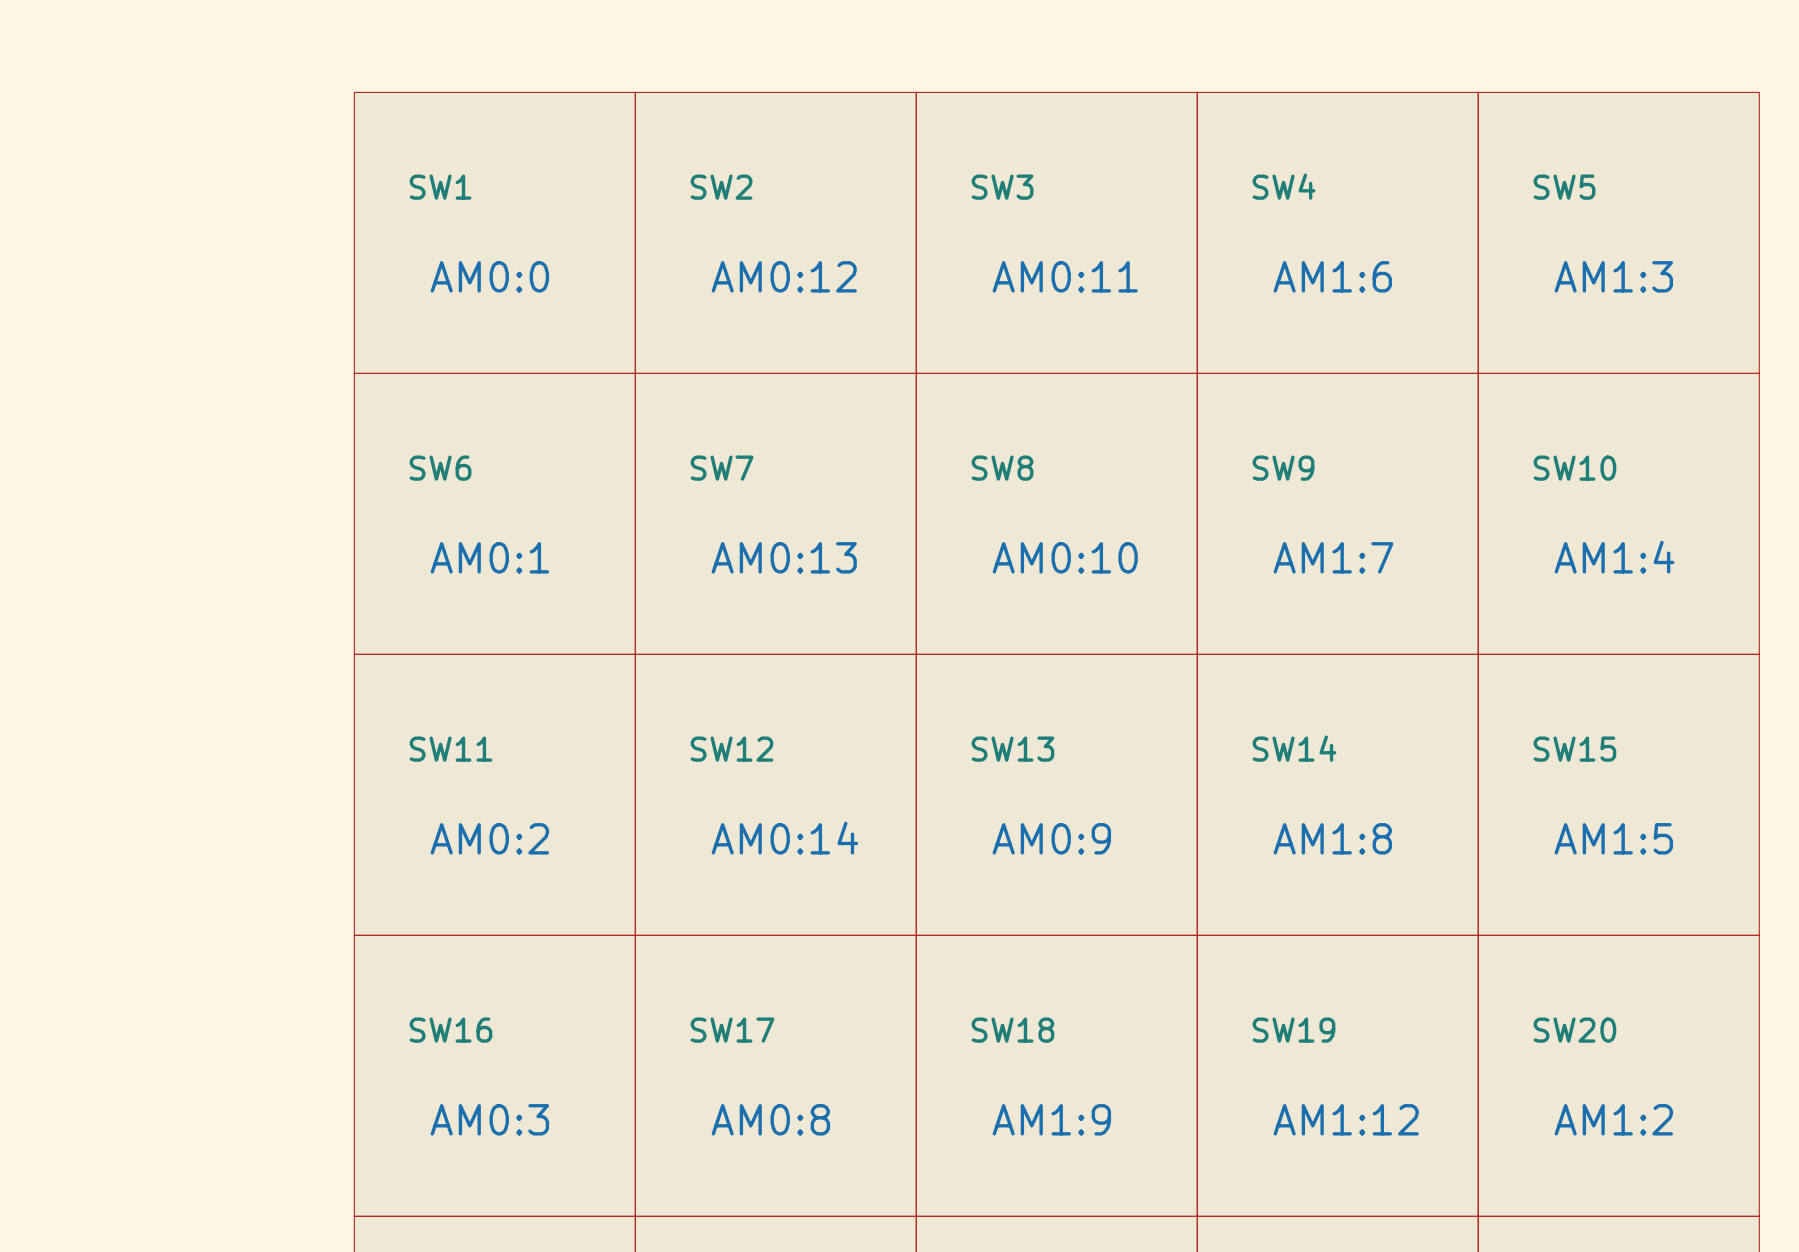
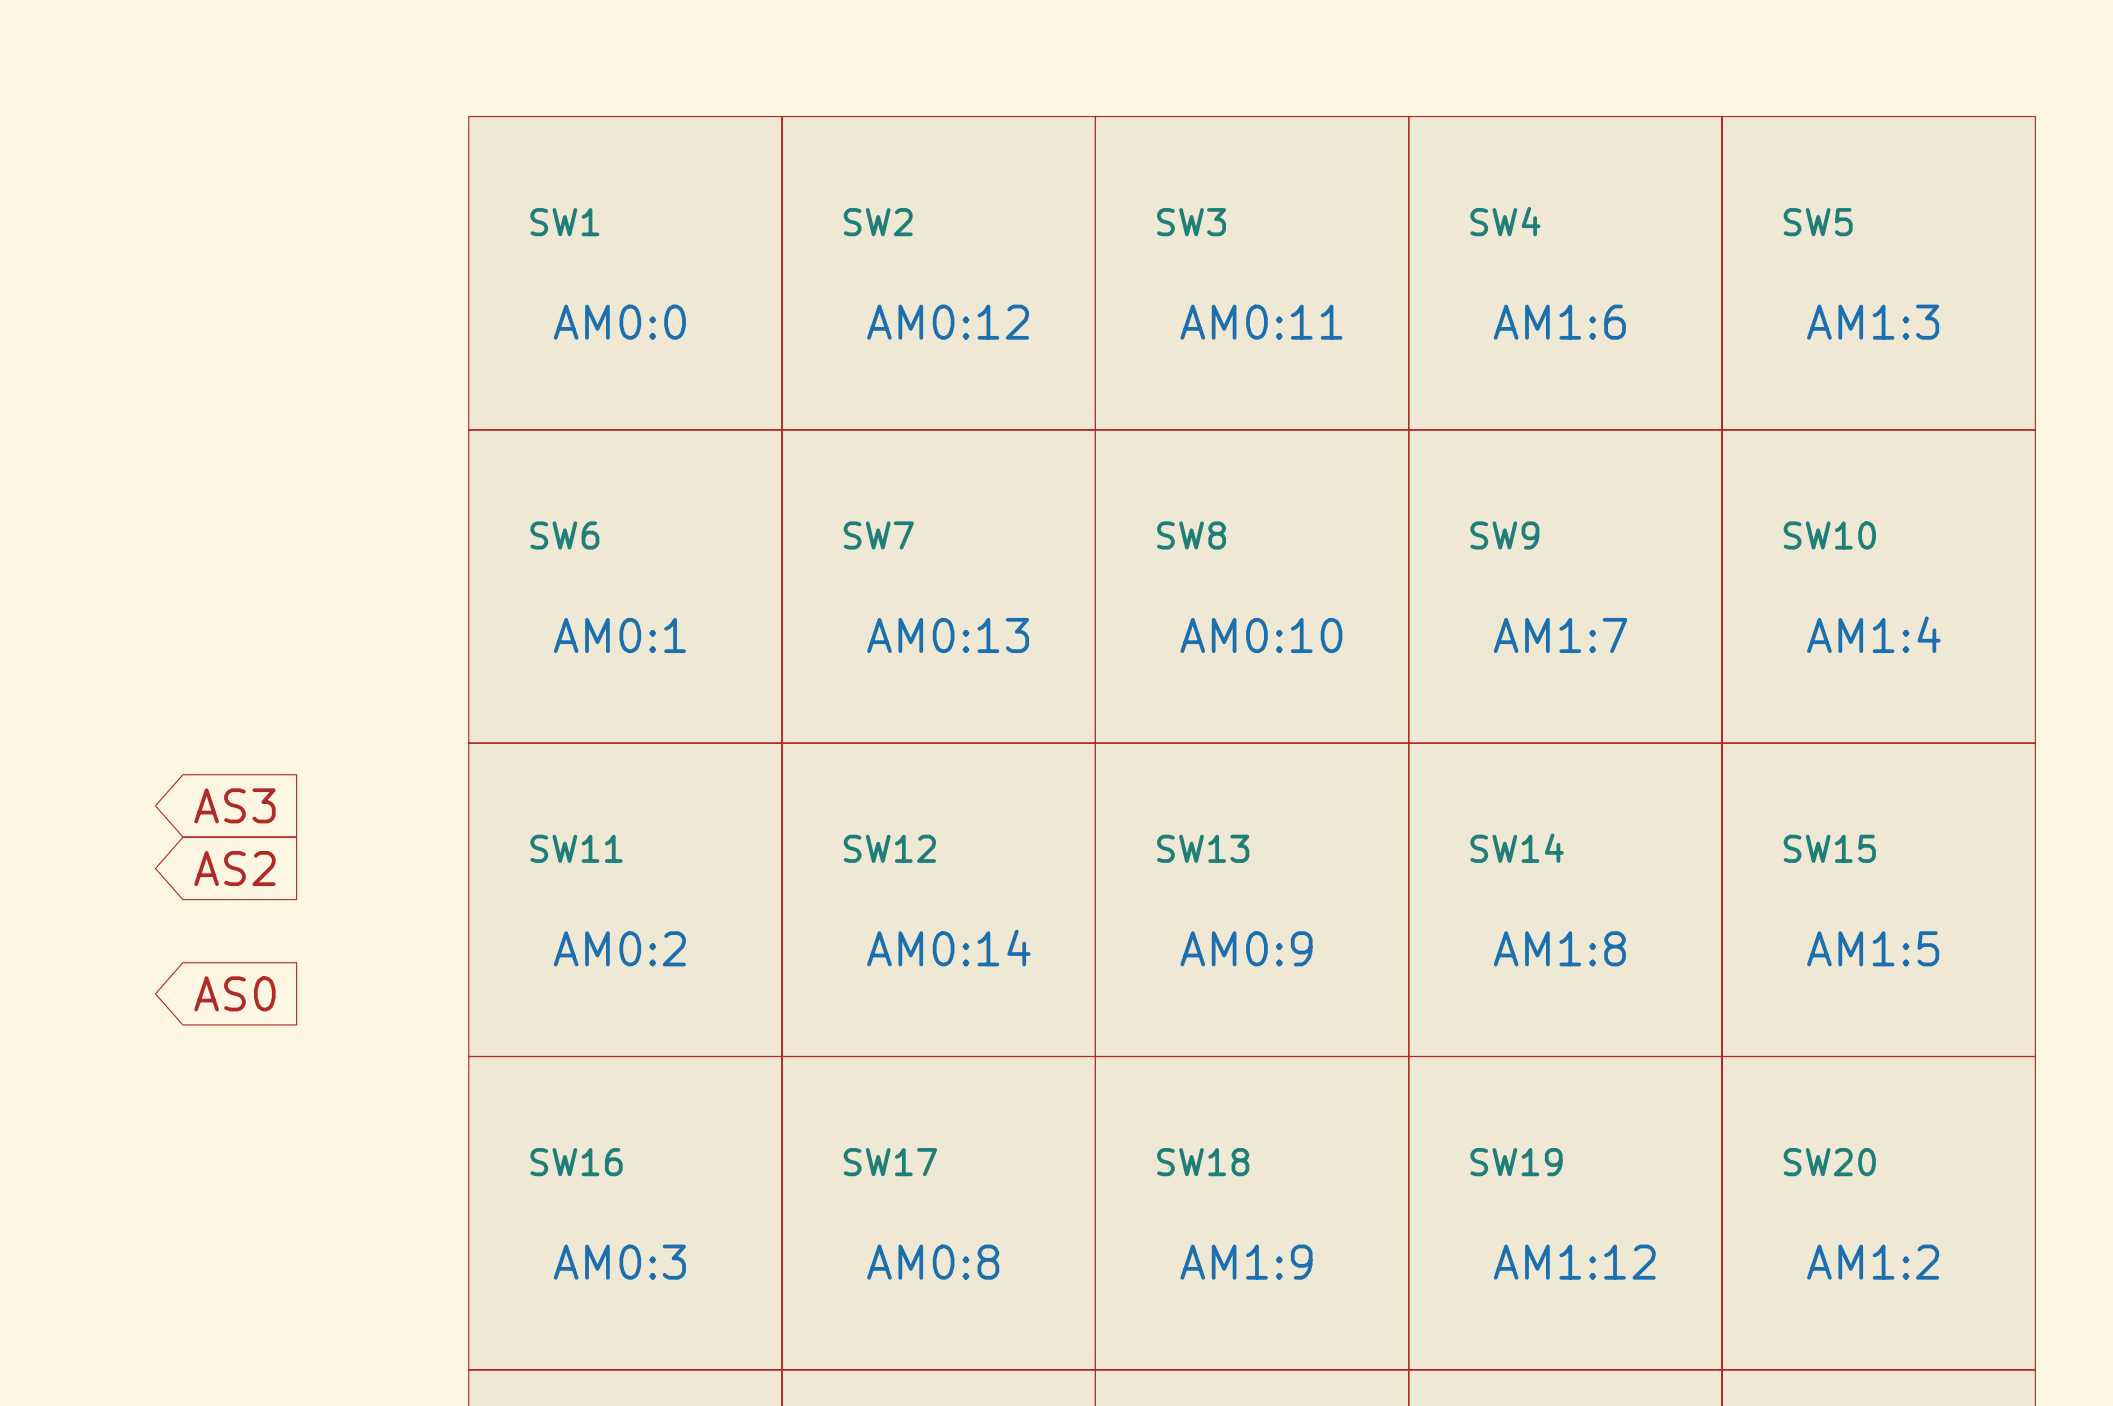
global label: none -> AS3 (234, 805)
global label: none -> AS2 (234, 868)
global label: none -> AS0 (234, 993)

